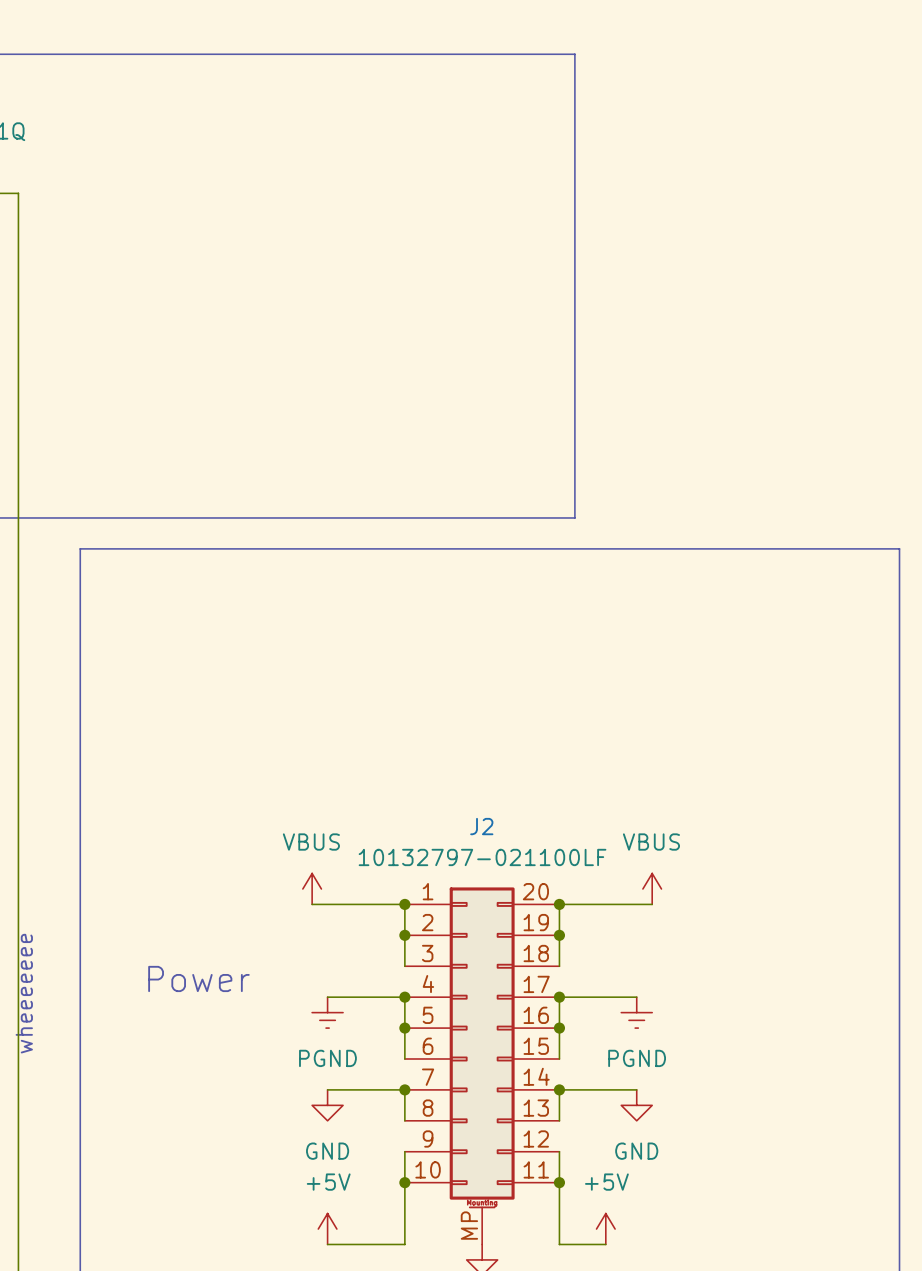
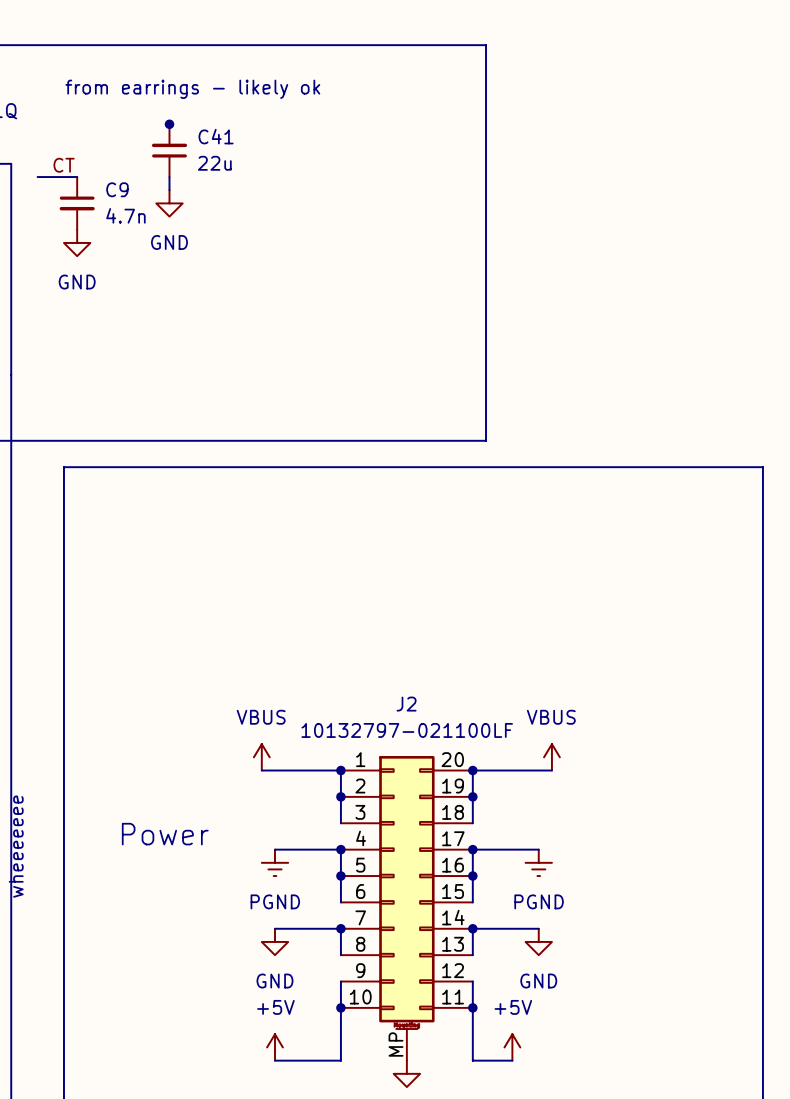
text: none -> from earrings - likely ok (192, 89)
junction: none -> (169, 124)
C41: none -> 22u (169, 150)
label: none -> CT (64, 165)
wire: none -> (37, 177) (77, 177)
wire: none -> (169, 177) (169, 190)
C9: none -> 4.7n (77, 203)
power symbol: none -> GND (169, 203)
power symbol: none -> GND (77, 242)

